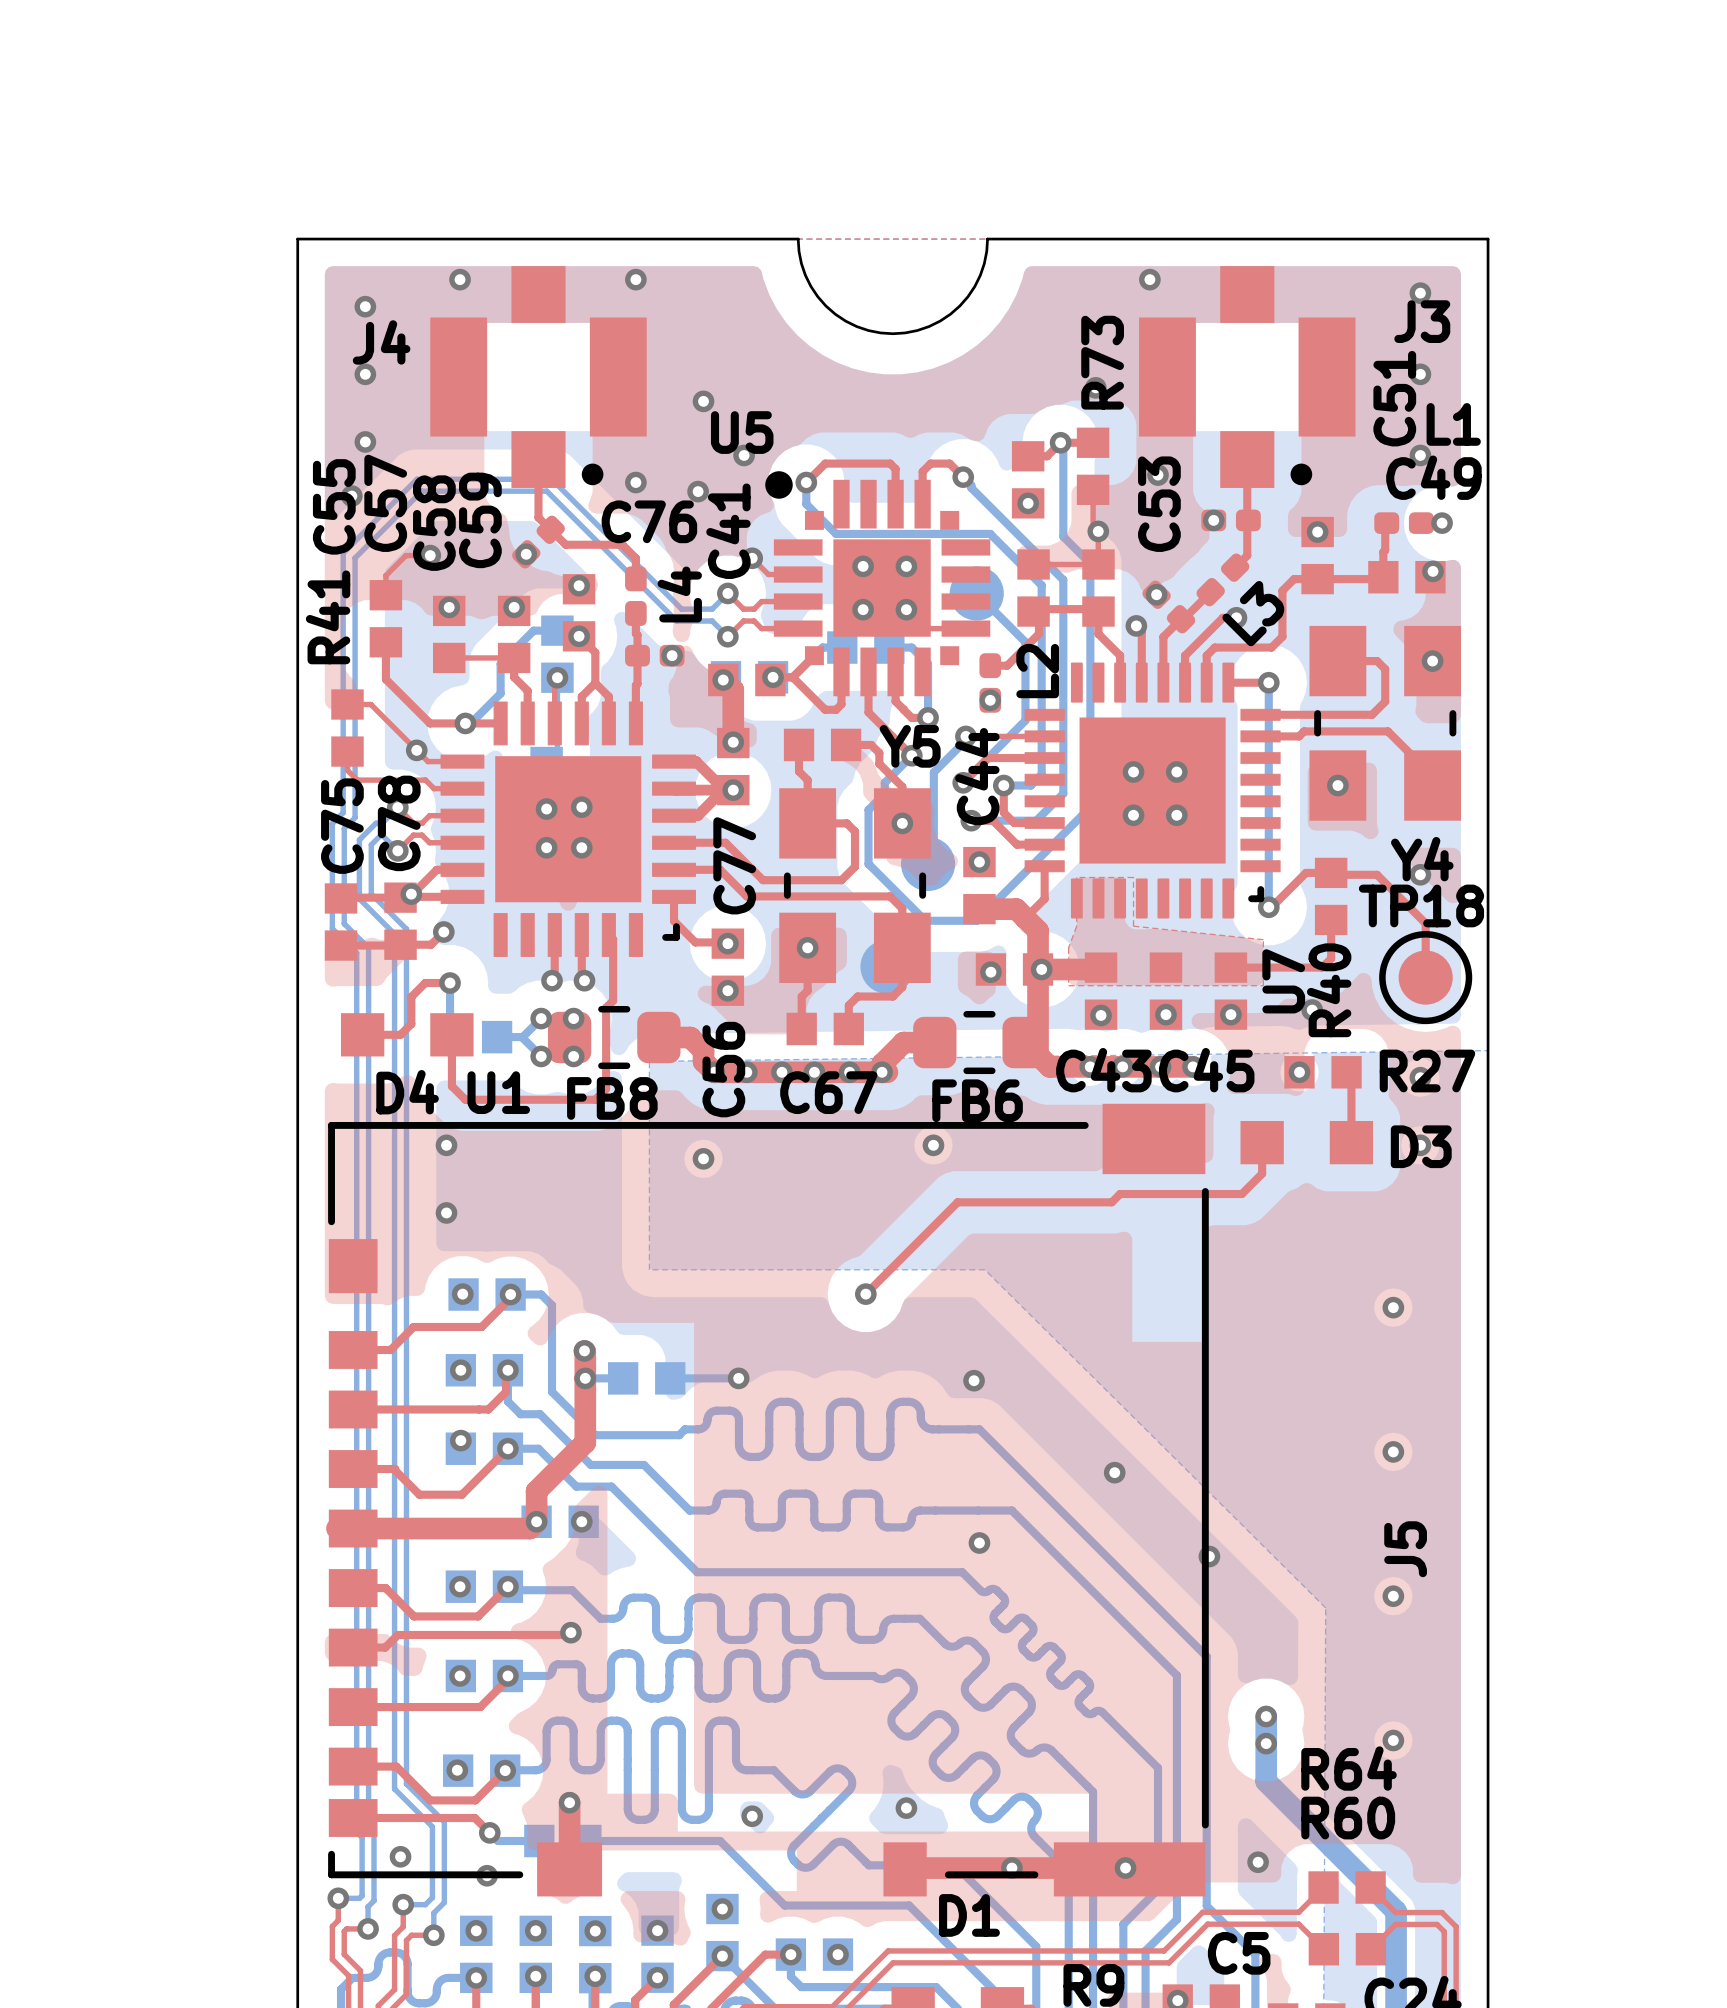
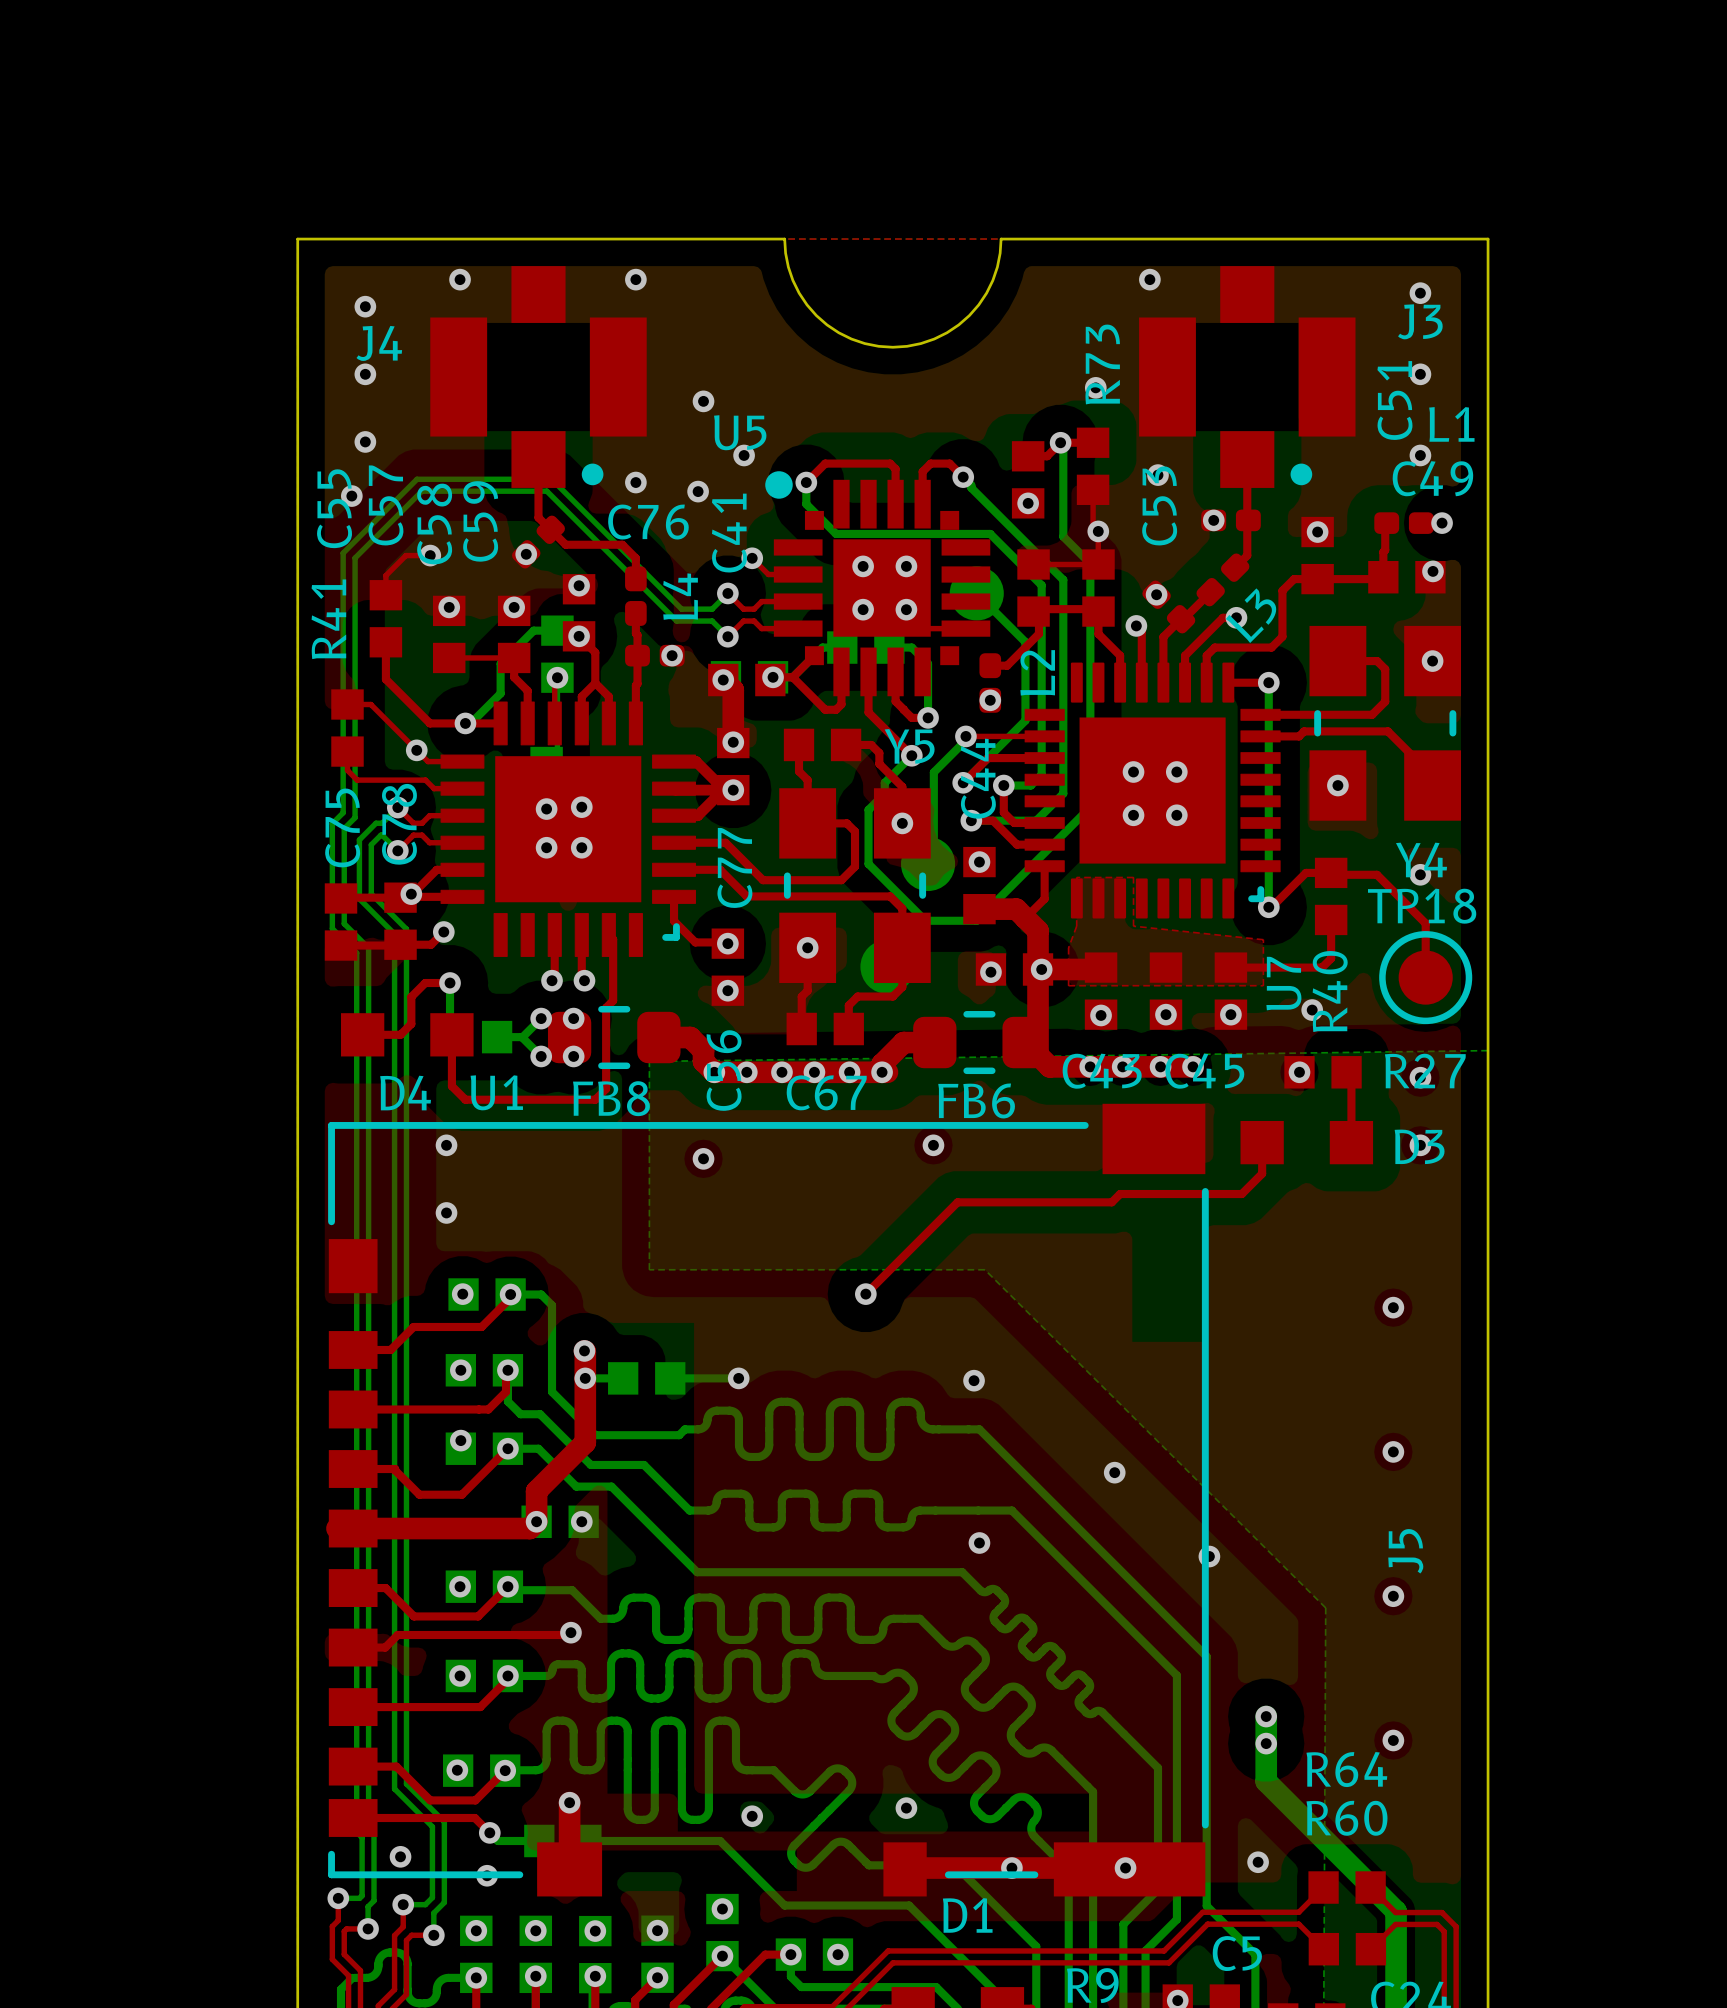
board edge: (784, 239) (798, 239) (801, 263) (810, 286) (817, 296) (835, 314) (845, 321) (868, 330) (892, 333) (917, 330) (940, 321) (950, 314) (968, 296) (974, 286) (984, 263) (987, 239) (1001, 239) -> (784, 239) (788, 267) (792, 280) (799, 293) (816, 315) (838, 332) (851, 339) (864, 343) (892, 347) (920, 343) (934, 339) (946, 332) (969, 315) (986, 293) (992, 280) (997, 267) (1001, 239)

